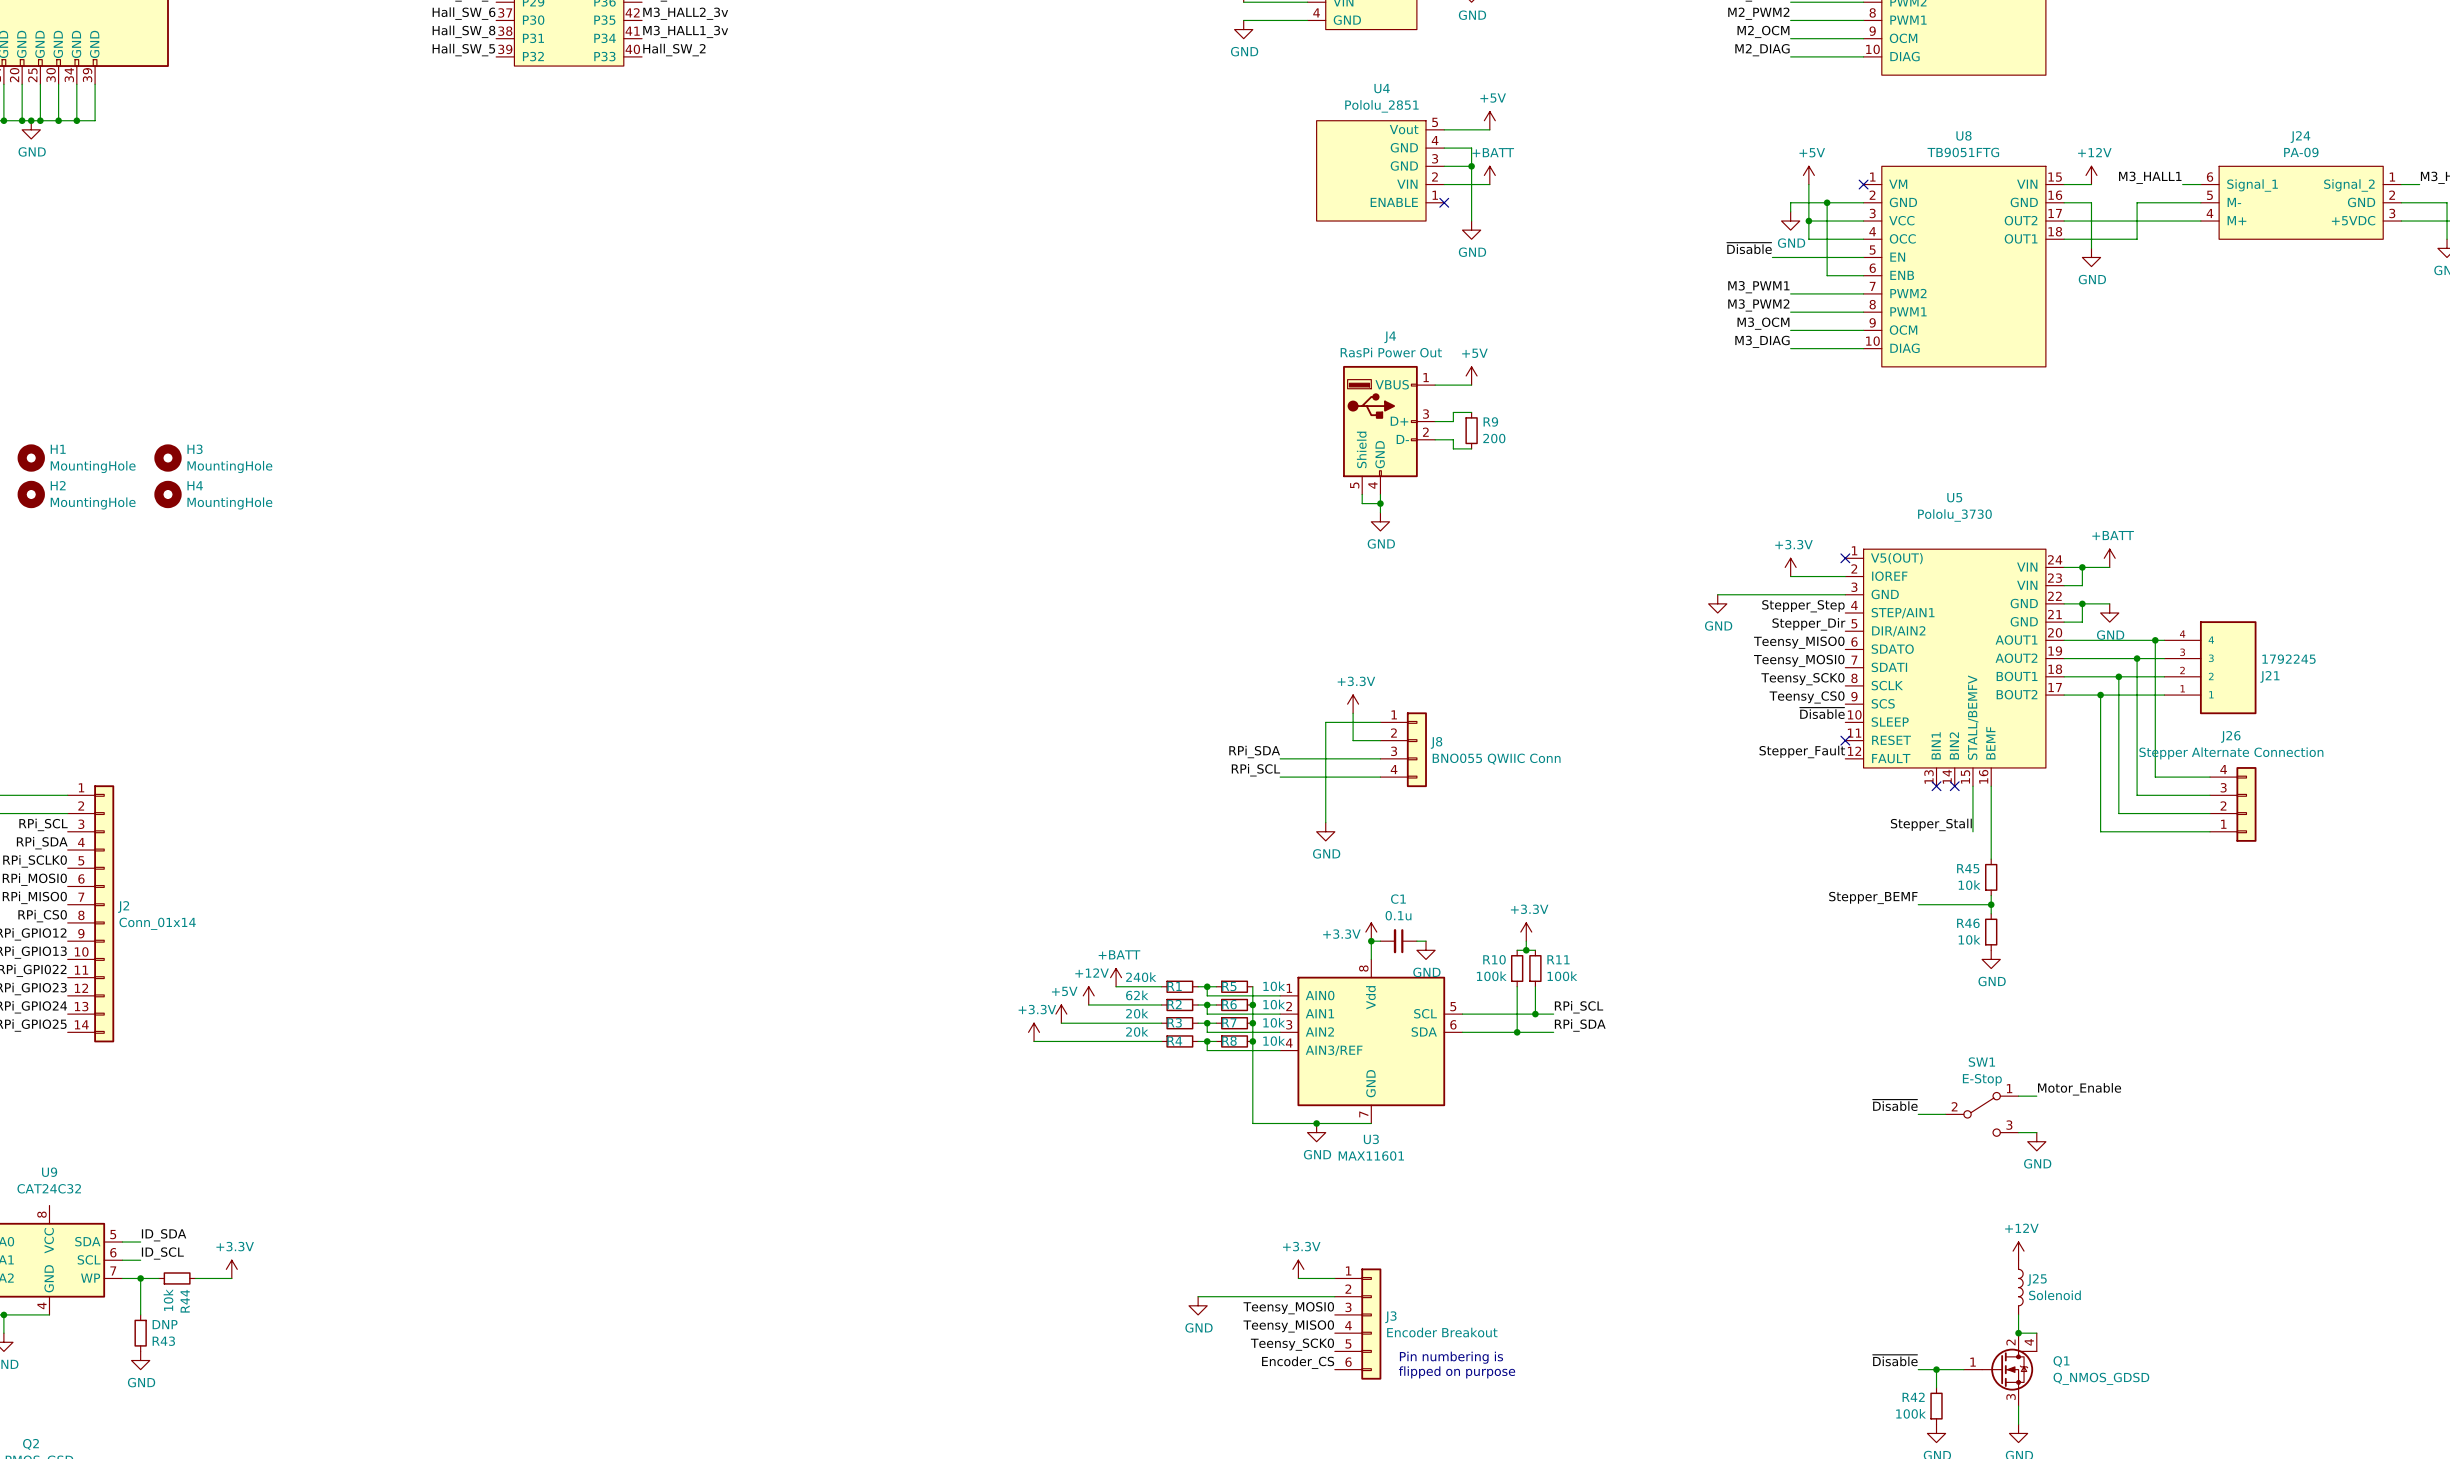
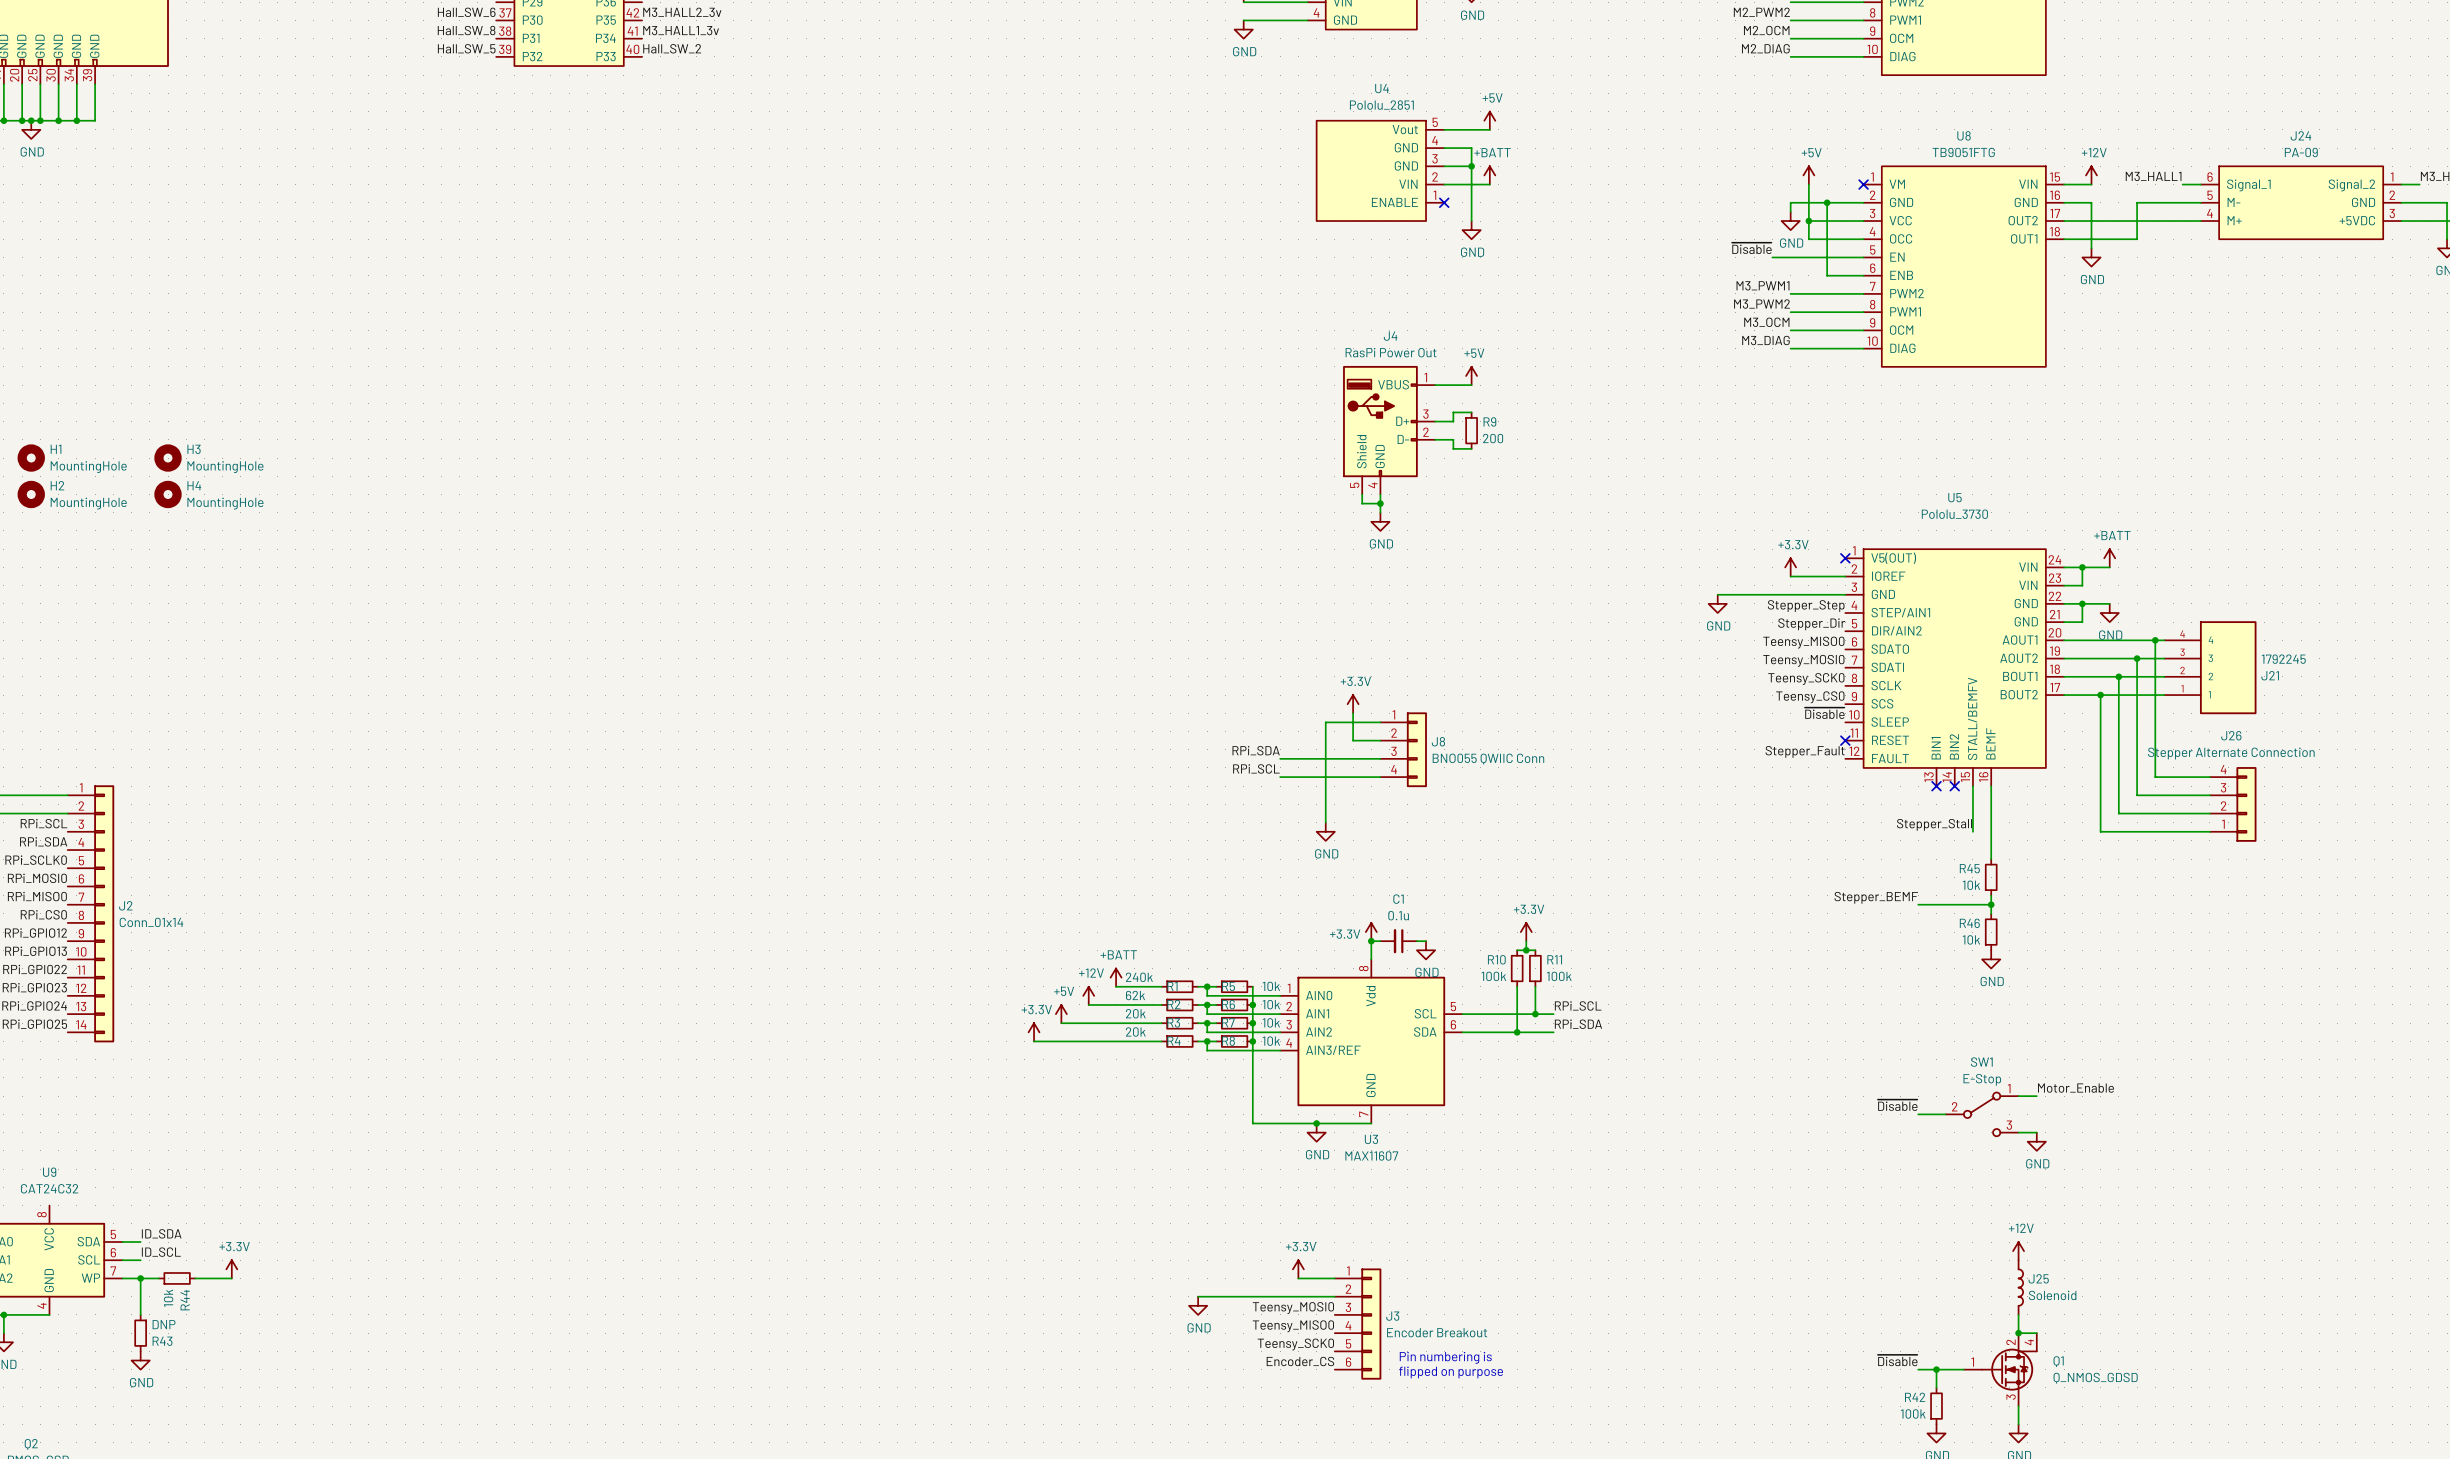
U3 value: MAX11601 (1371, 1155) -> MAX11607 (1371, 1155)

